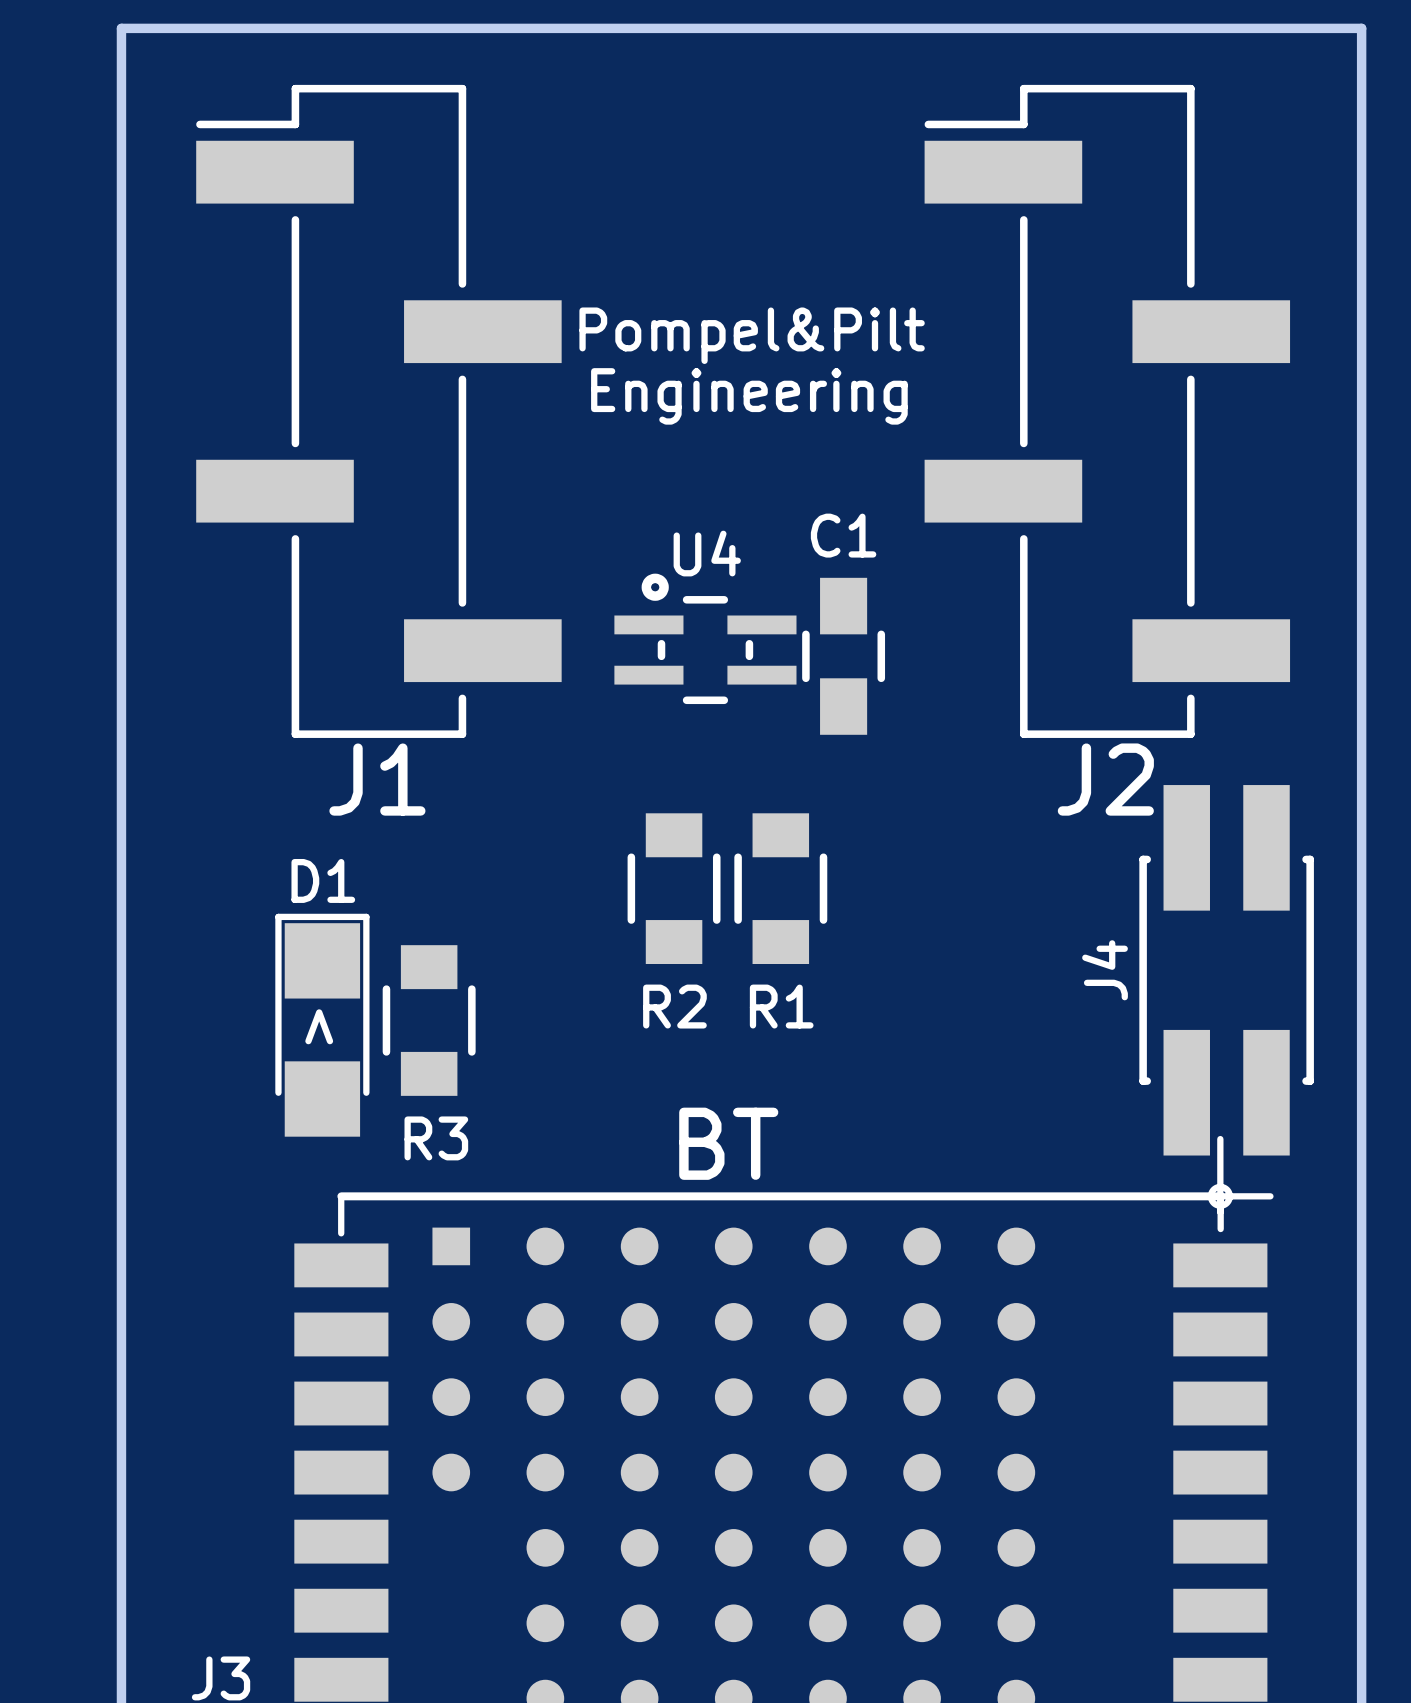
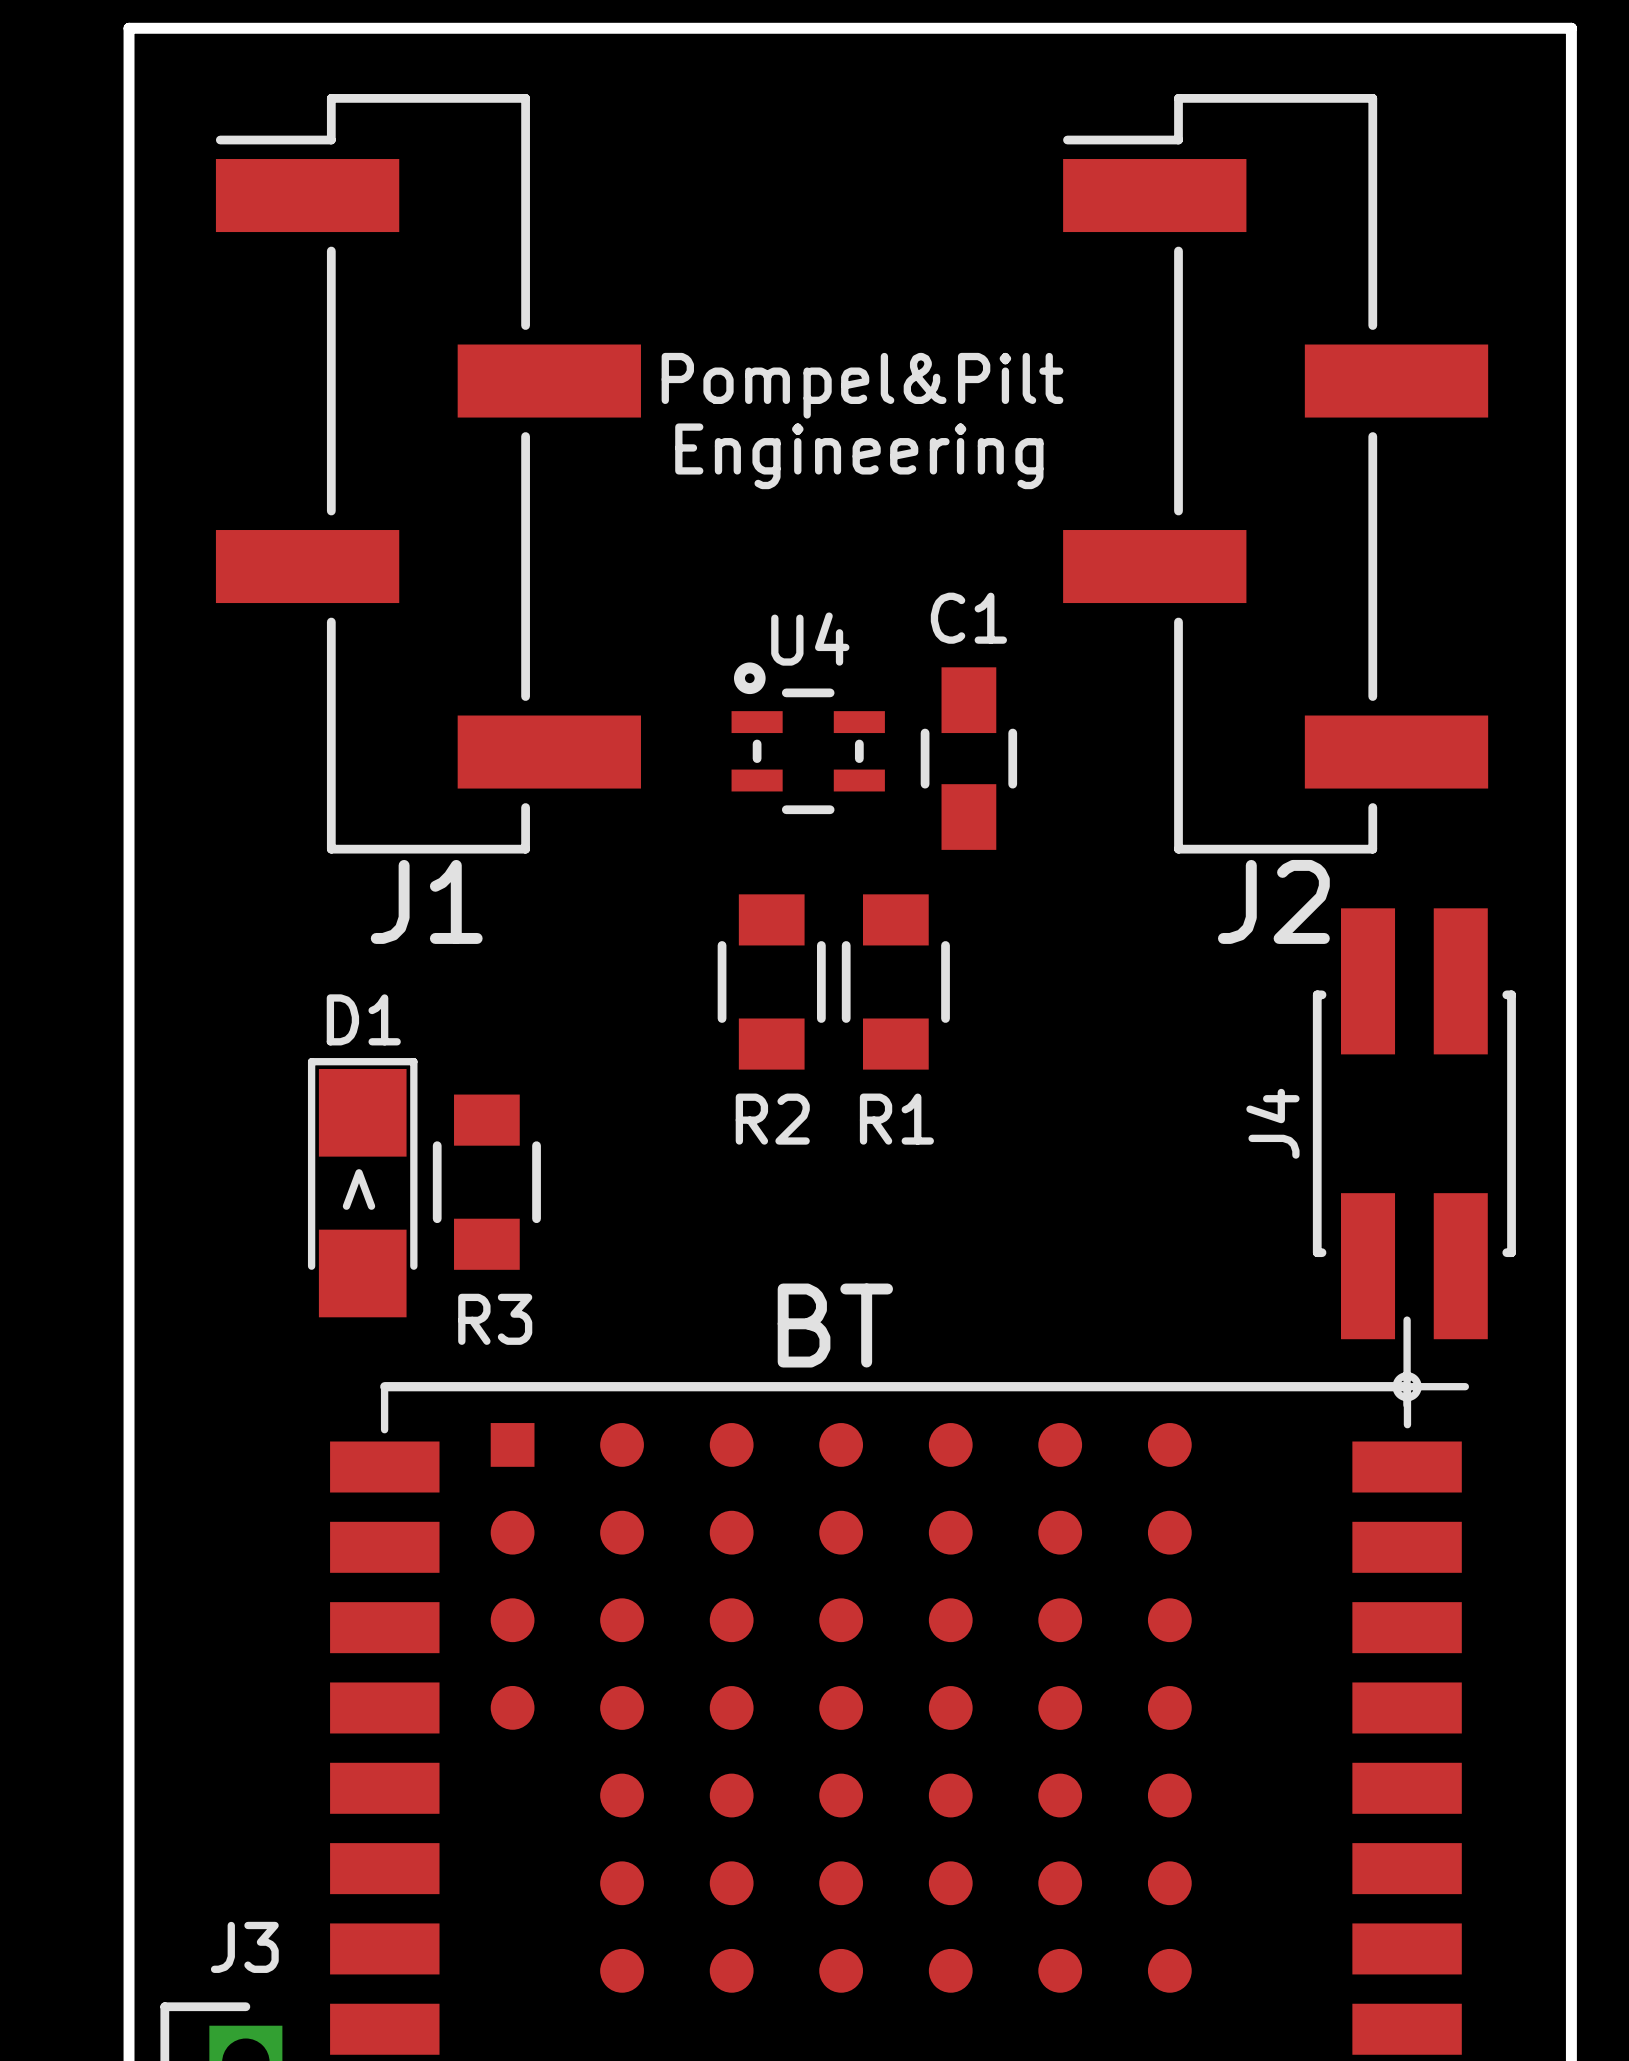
U4 footprint: [614, 596, 797, 705] -> [731, 688, 885, 815]
R2 position: (674, 888) -> (771, 981)
R1 position: (780, 888) -> (895, 981)

